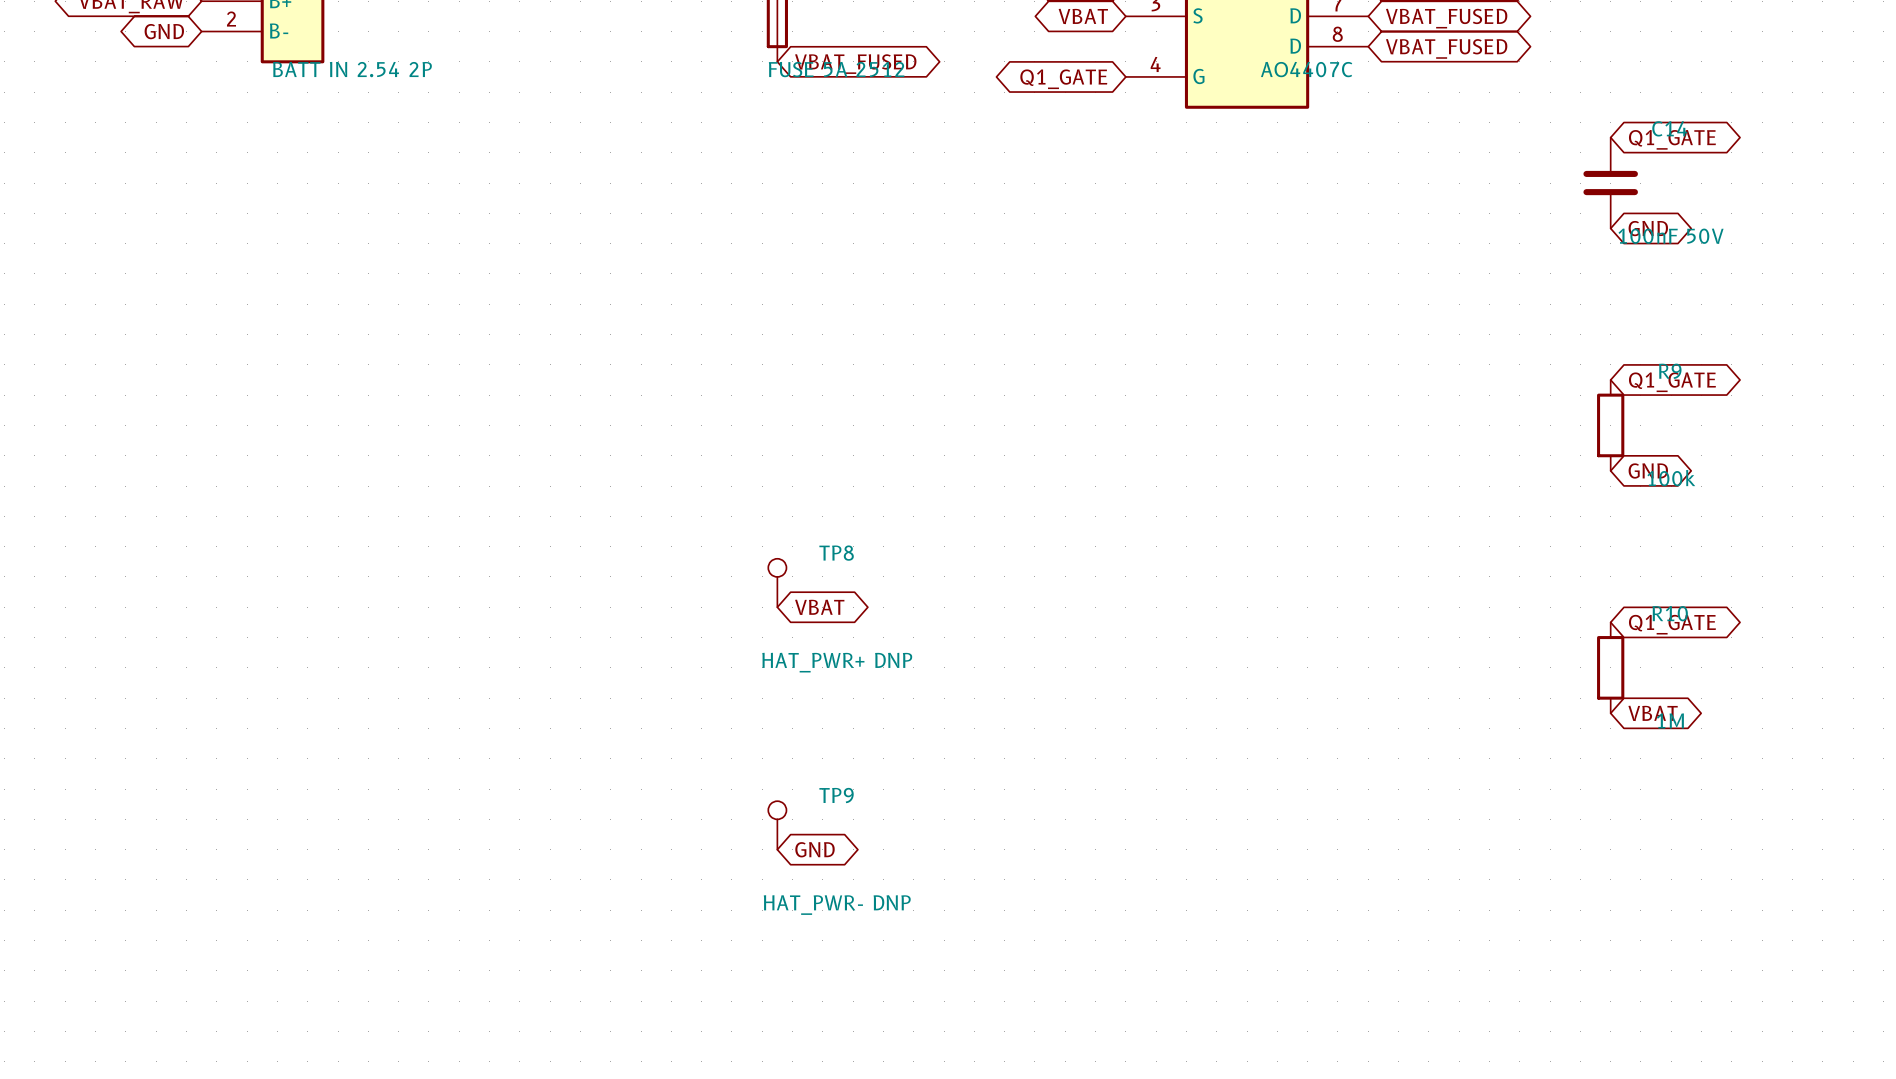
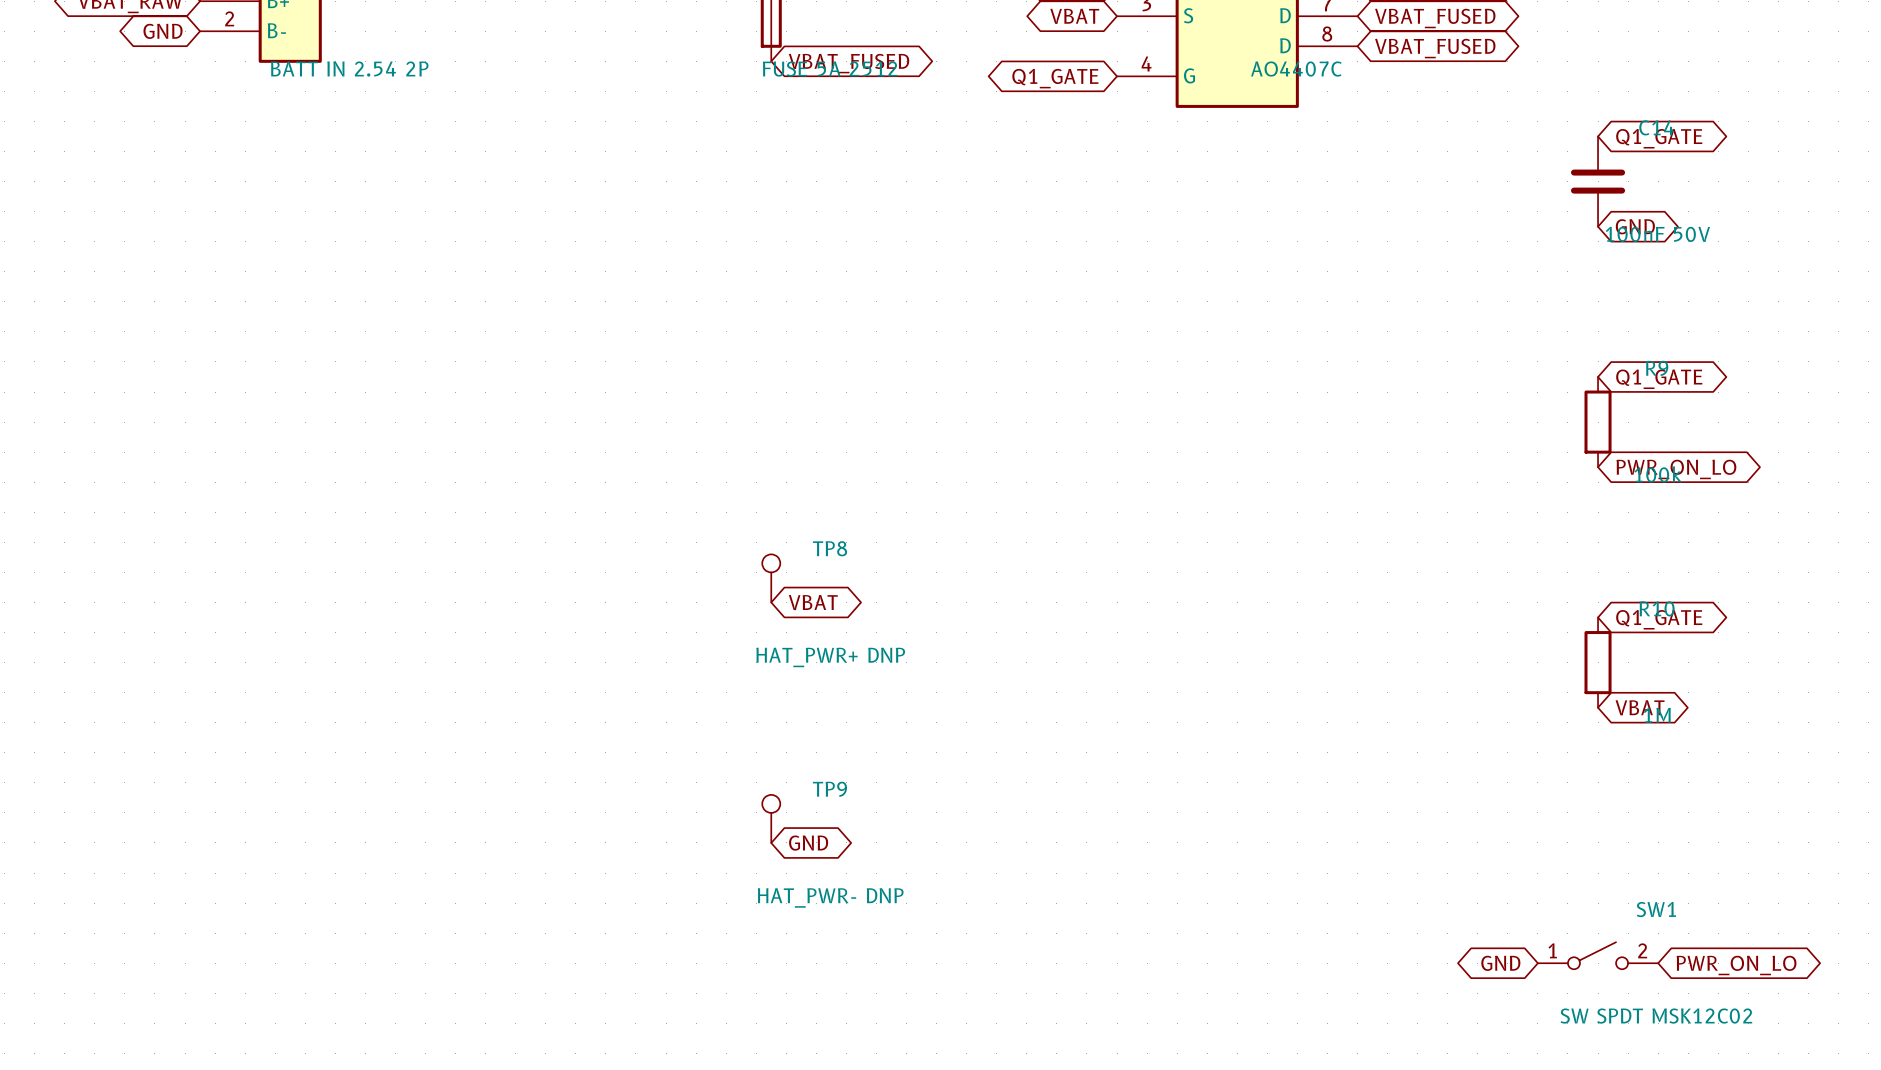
global label: GND (1648, 470) -> PWR_ON_LO (1676, 469)
SW1: none -> SW SPDT MSK12C02 (1598, 955)
global label: none -> GND (1500, 963)
global label: none -> PWR_ON_LO (1736, 965)

